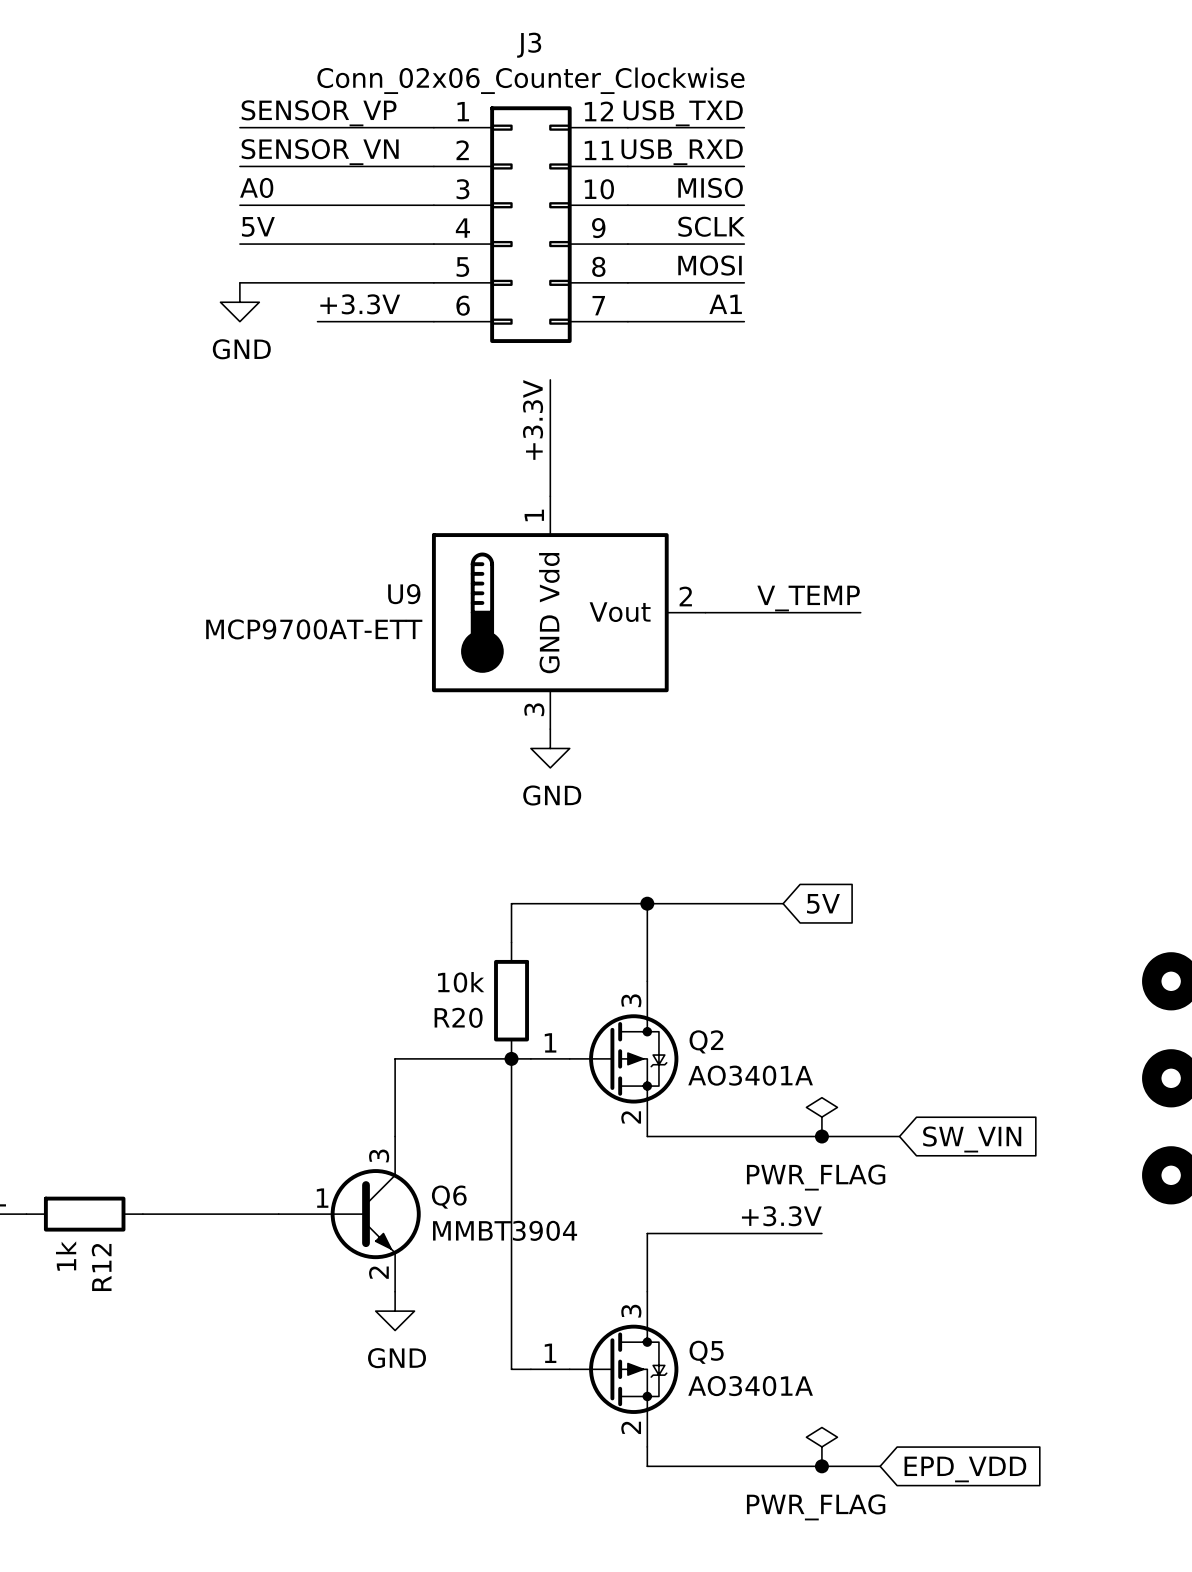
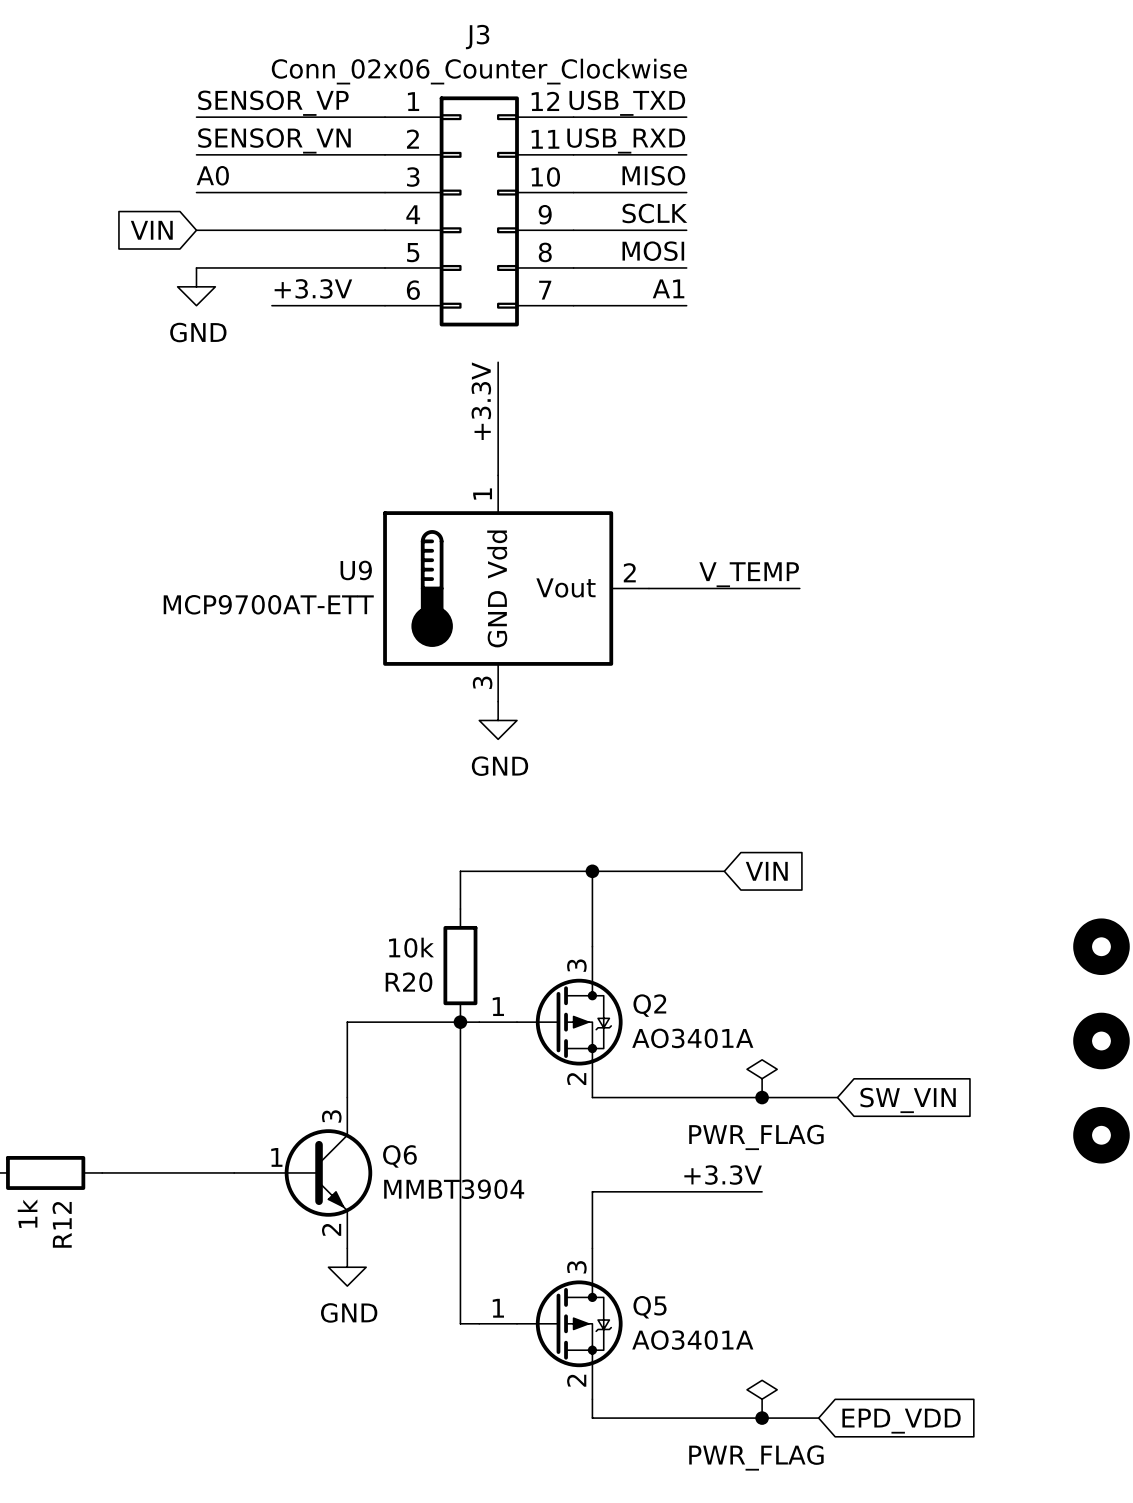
label: 5V (258, 226) -> none
global label: none -> VIN (151, 230)
global label: 5V (823, 903) -> VIN (766, 871)

